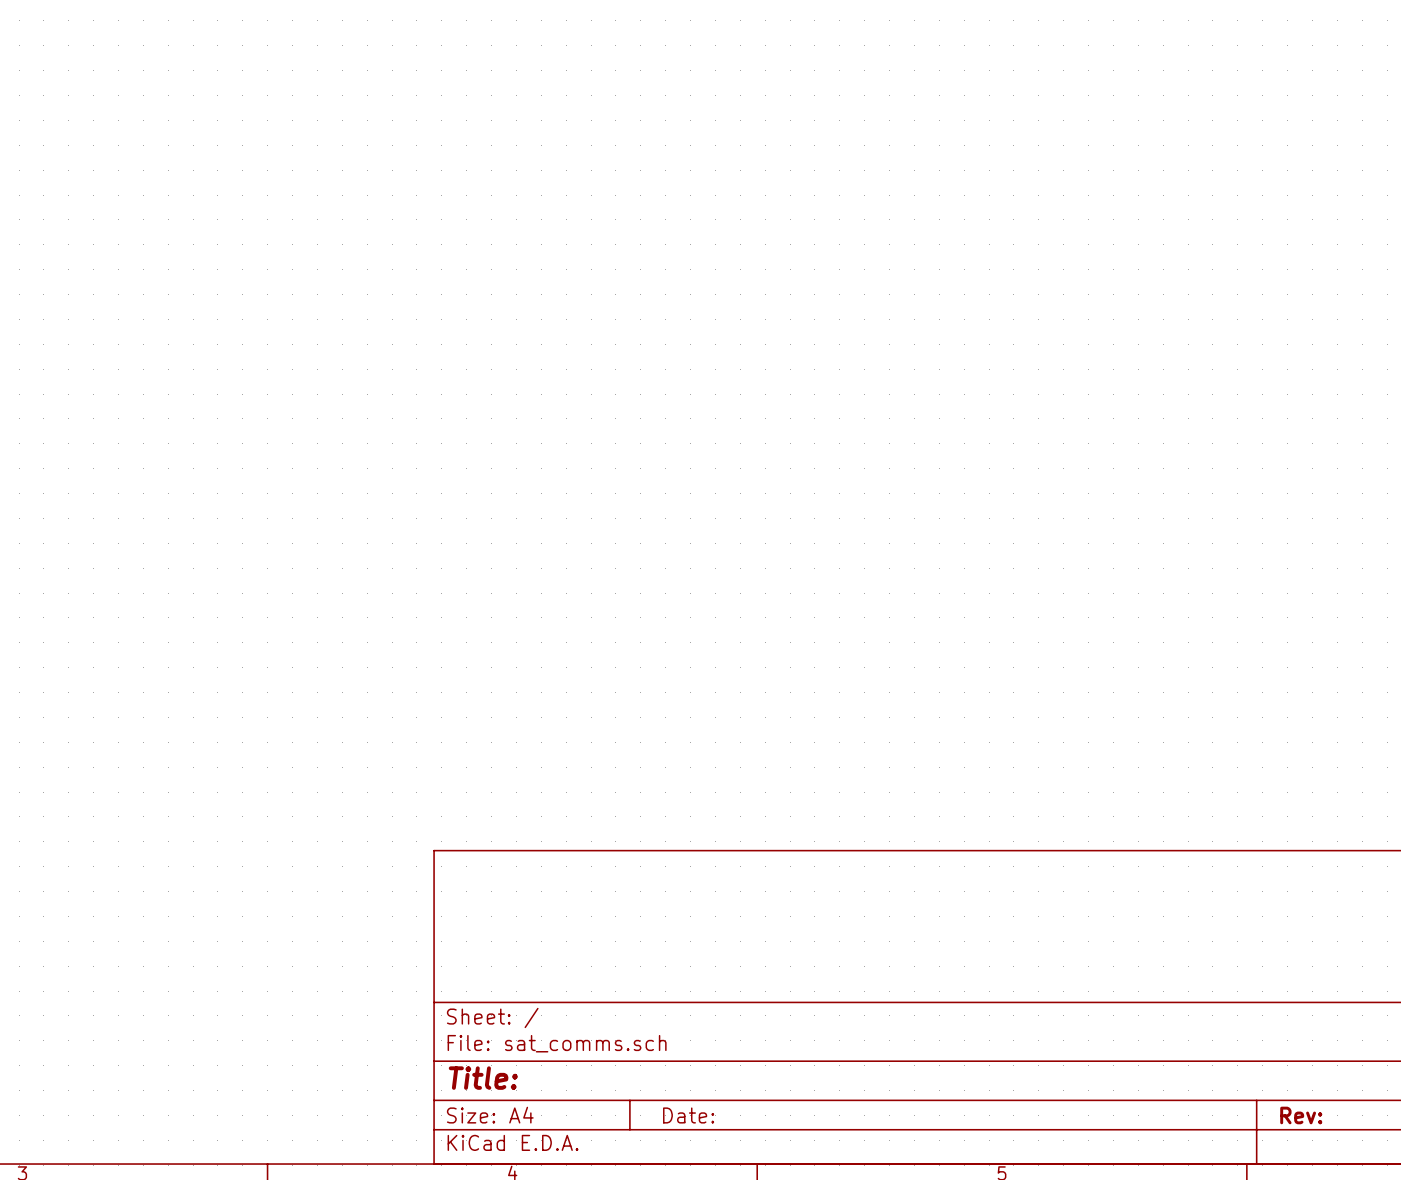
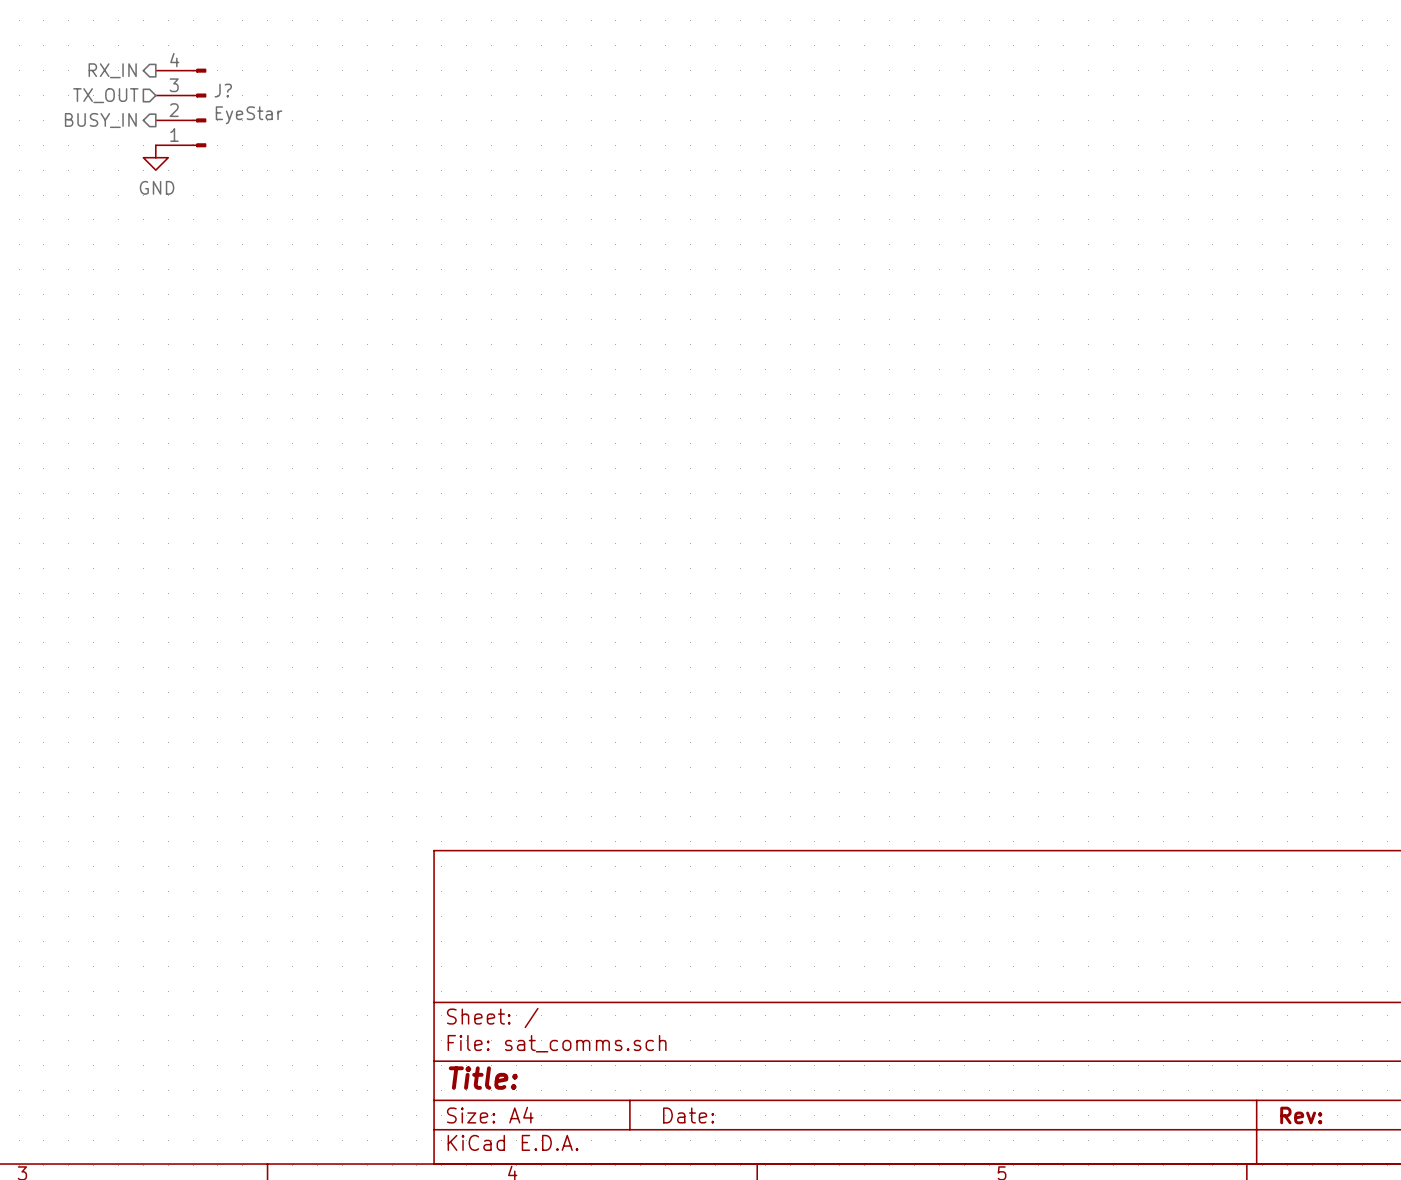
hierarchical label: none -> RX_IN (112, 70)
hierarchical label: none -> TX_OUT (105, 95)
J?: none -> EyeStar (181, 107)
hierarchical label: none -> BUSY_IN (100, 120)
power symbol: none -> GND (155, 157)

